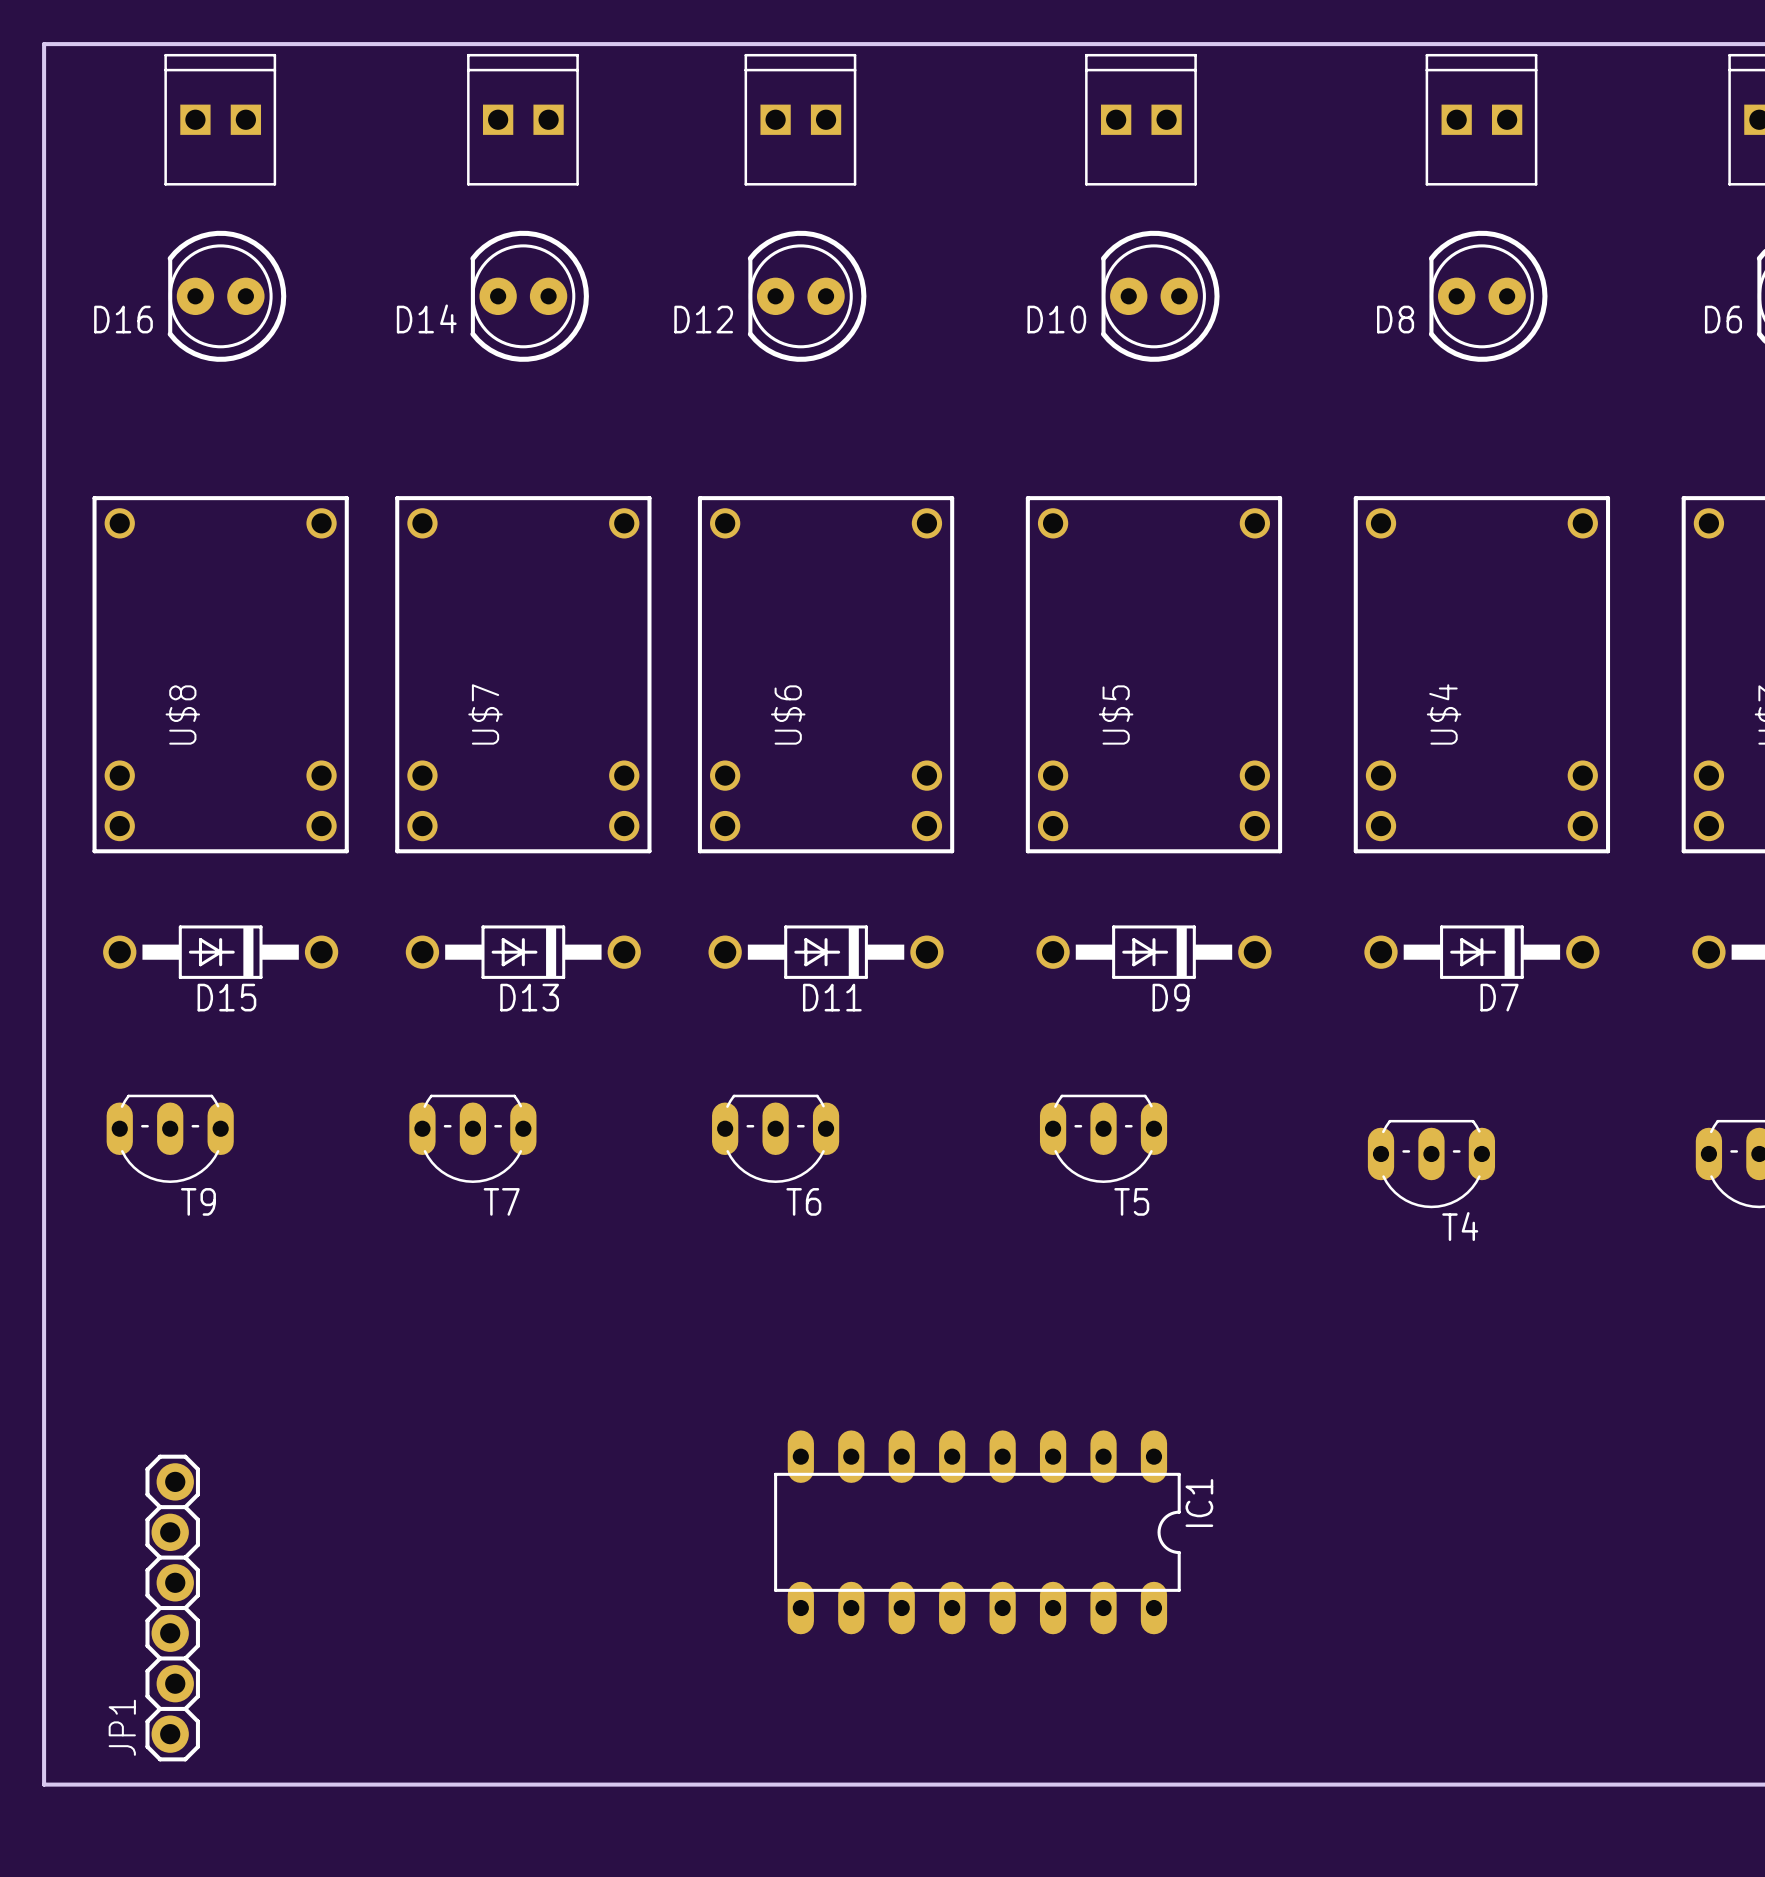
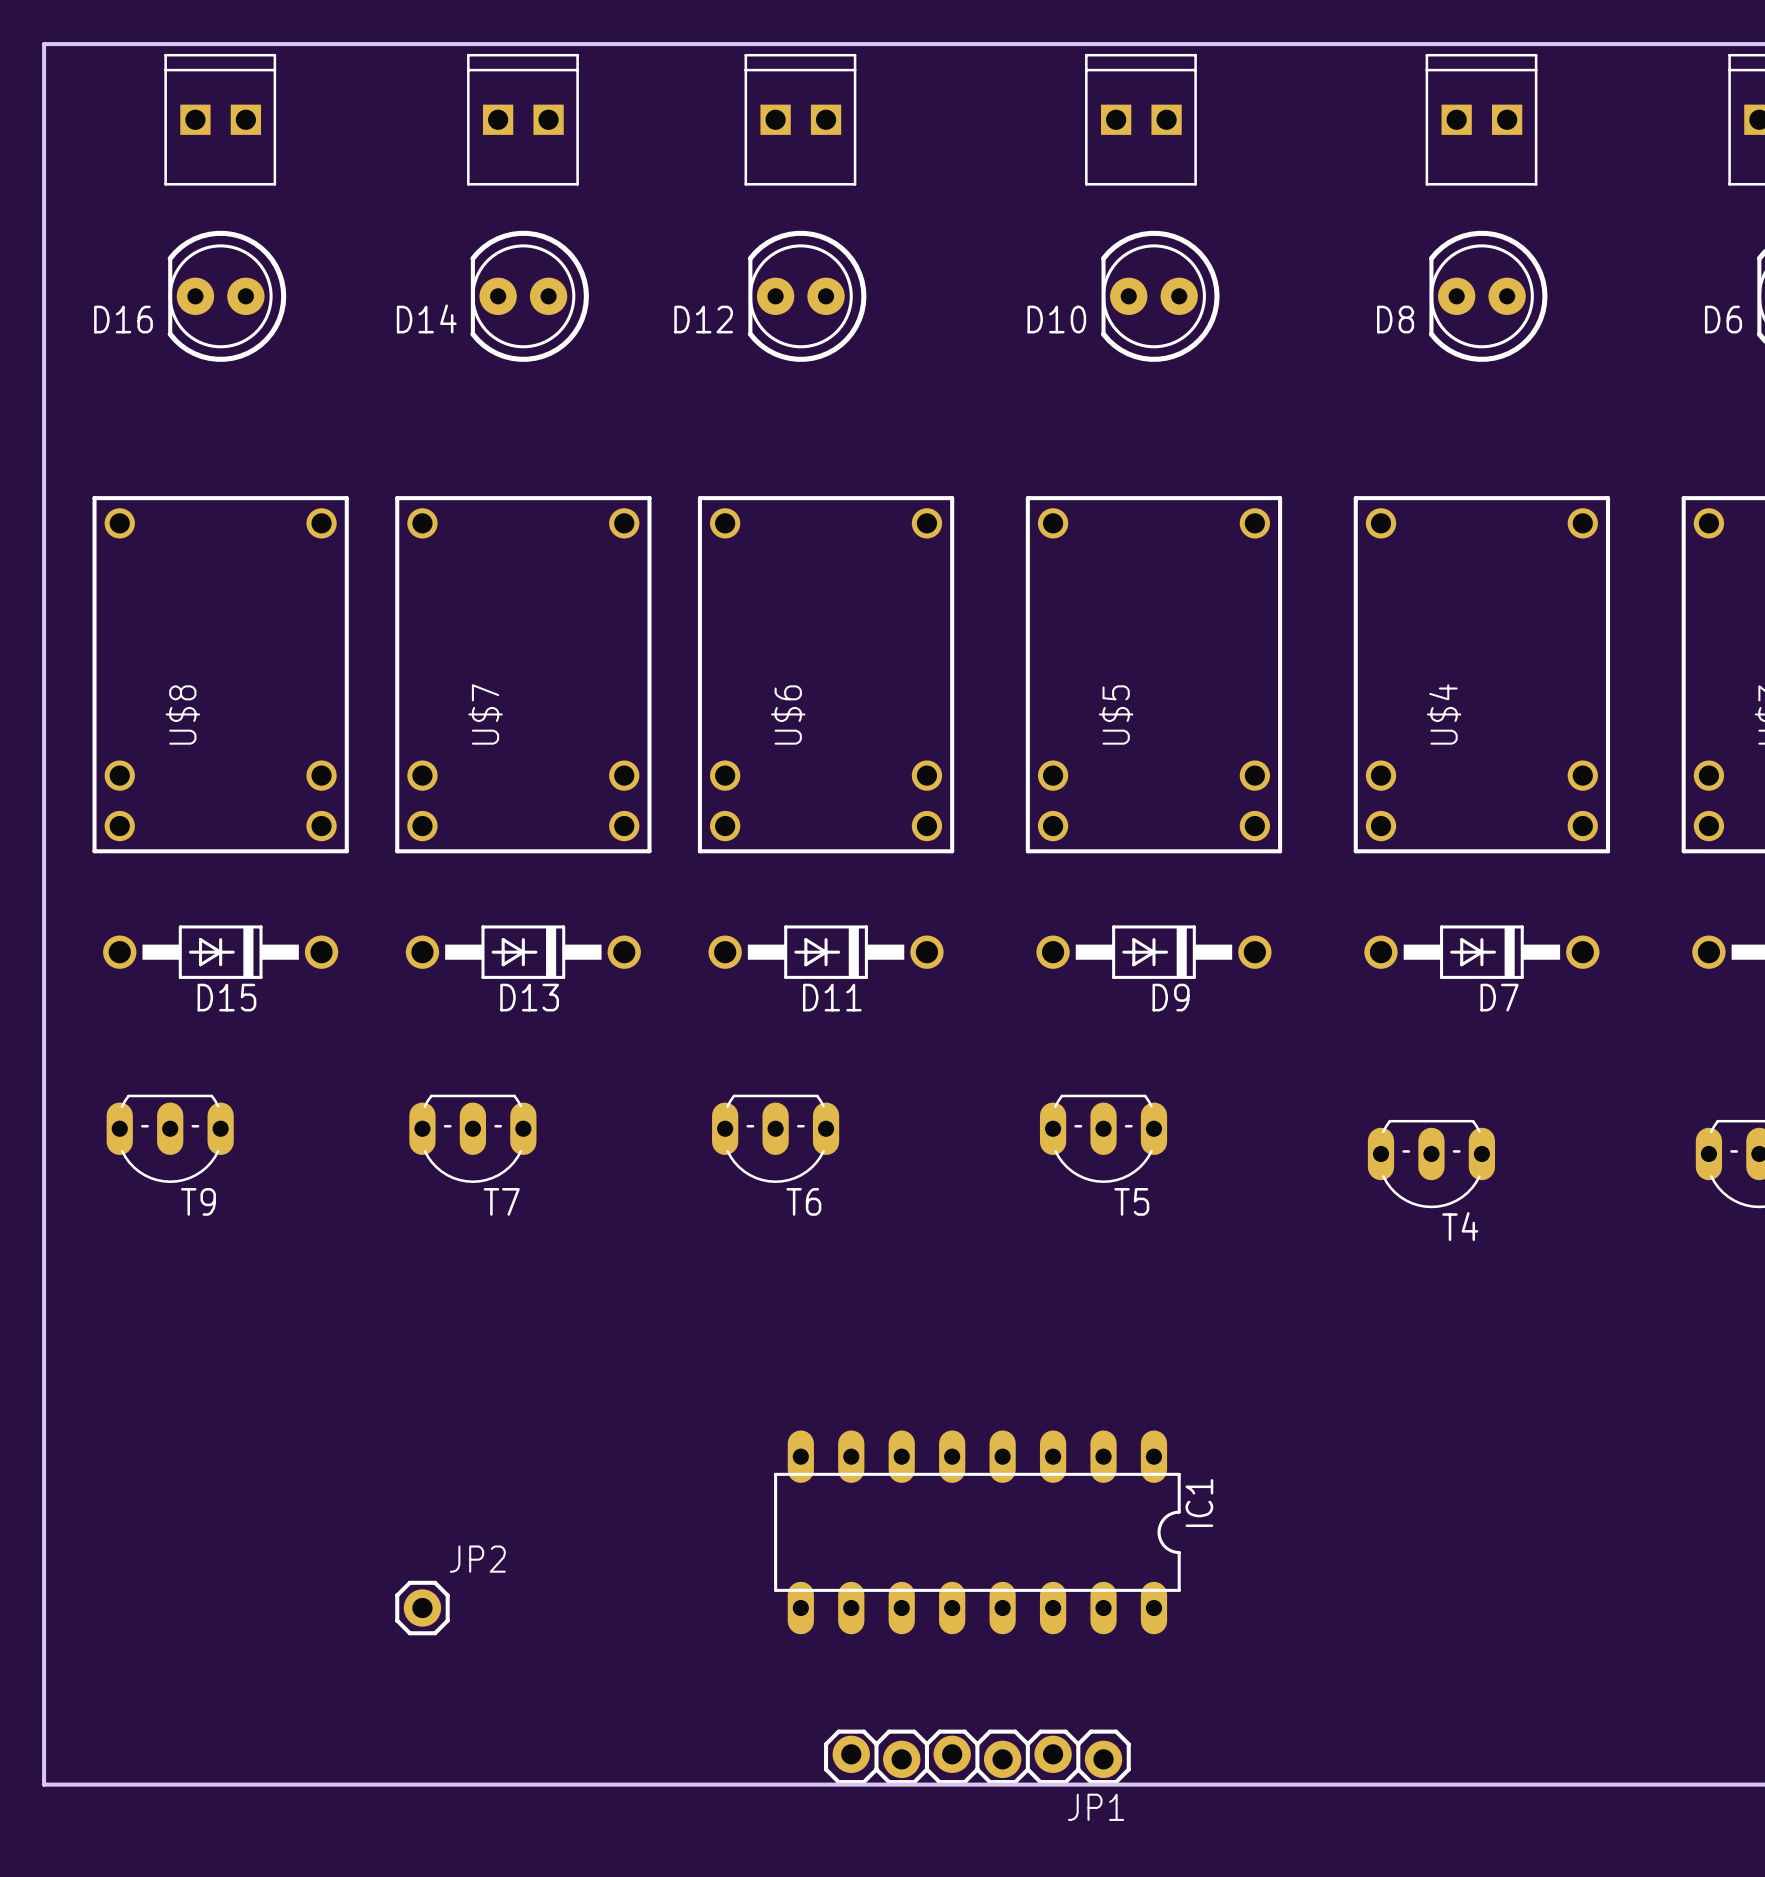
JP1 rotation: 0° (172, 1608) -> 90° clockwise (977, 1756)
JP1 position: (172, 1608) -> (977, 1756)
JP2: none -> (422, 1608)
JP1 name position: JP1 (122, 1727) -> JP1 (1096, 1807)

